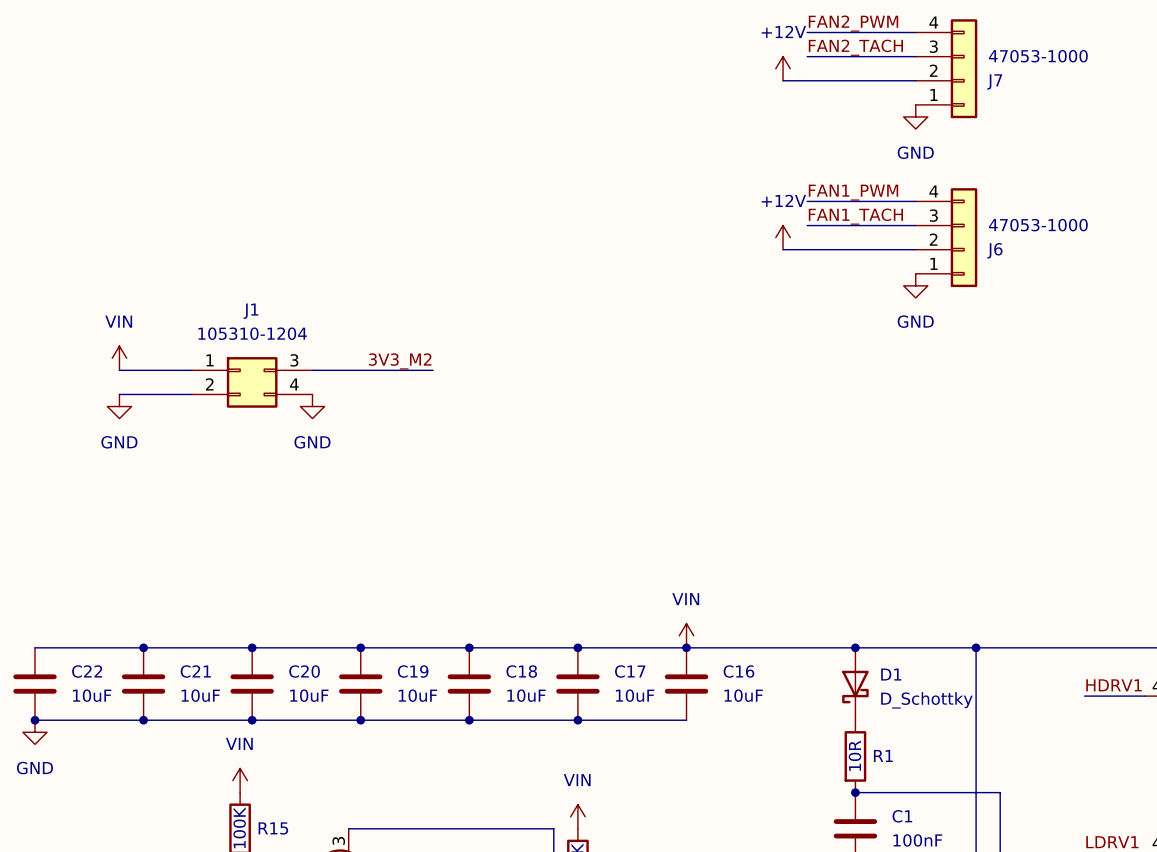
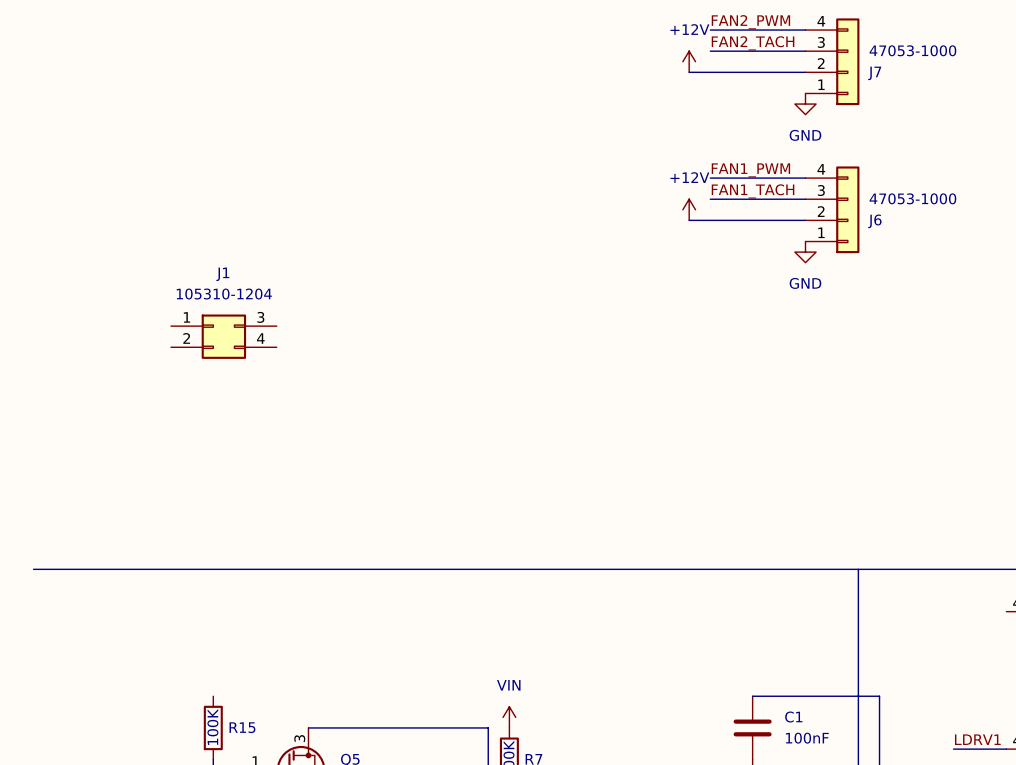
power symbol: VIN (119, 358) -> none
label: 3V3_M2 (400, 361) -> none
wire: (119, 370) (191, 370) -> none
wire: (312, 370) (433, 370) -> none
wire: (119, 394) (191, 394) -> none
power symbol: GND (119, 406) -> none
power symbol: GND (312, 406) -> none
power symbol: VIN (686, 635) -> none
junction: (143, 647) -> none
junction: (252, 647) -> none
junction: (360, 647) -> none
junction: (469, 647) -> none
junction: (577, 647) -> none
junction: (686, 647) -> none
junction: (855, 647) -> none
junction: (976, 647) -> none
C22: 10uF (34, 684) -> none
C21: 10uF (143, 684) -> none
C20: 10uF (252, 684) -> none
C19: 10uF (360, 684) -> none
C18: 10uF (469, 684) -> none
C17: 10uF (577, 684) -> none
C16: 10uF (686, 684) -> none
D1: D_Schottky (855, 684) -> none
label: HDRV1 (1113, 685) -> none
wire: (1084, 696) (1144, 696) -> none
wire: (34, 720) (686, 720) -> none
junction: (34, 720) -> none
junction: (143, 720) -> none
junction: (252, 720) -> none
junction: (360, 720) -> none
junction: (469, 720) -> none
junction: (577, 720) -> none
power symbol: GND (34, 732) -> none
R1: 10R (855, 756) -> none
power symbol: VIN (240, 780) -> none
junction: (855, 792) -> none

